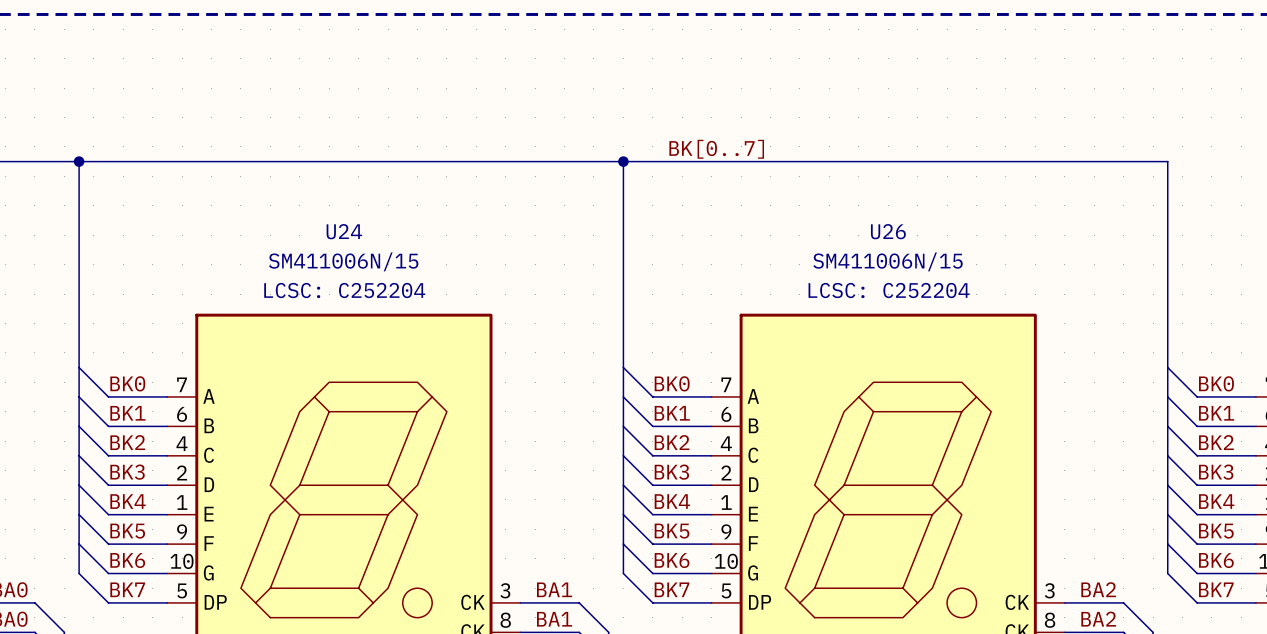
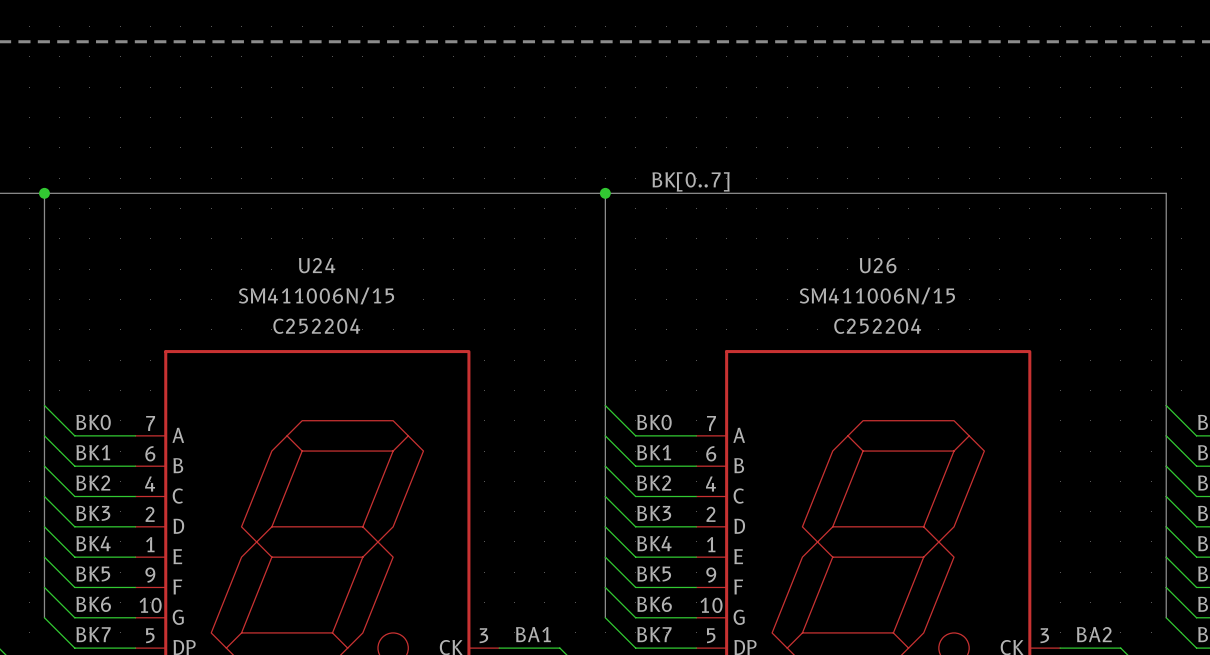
U24 text: LCSC: C252204 (344, 290) -> C252204 (316, 326)
U26 text: LCSC: C252204 (889, 290) -> C252204 (877, 326)

